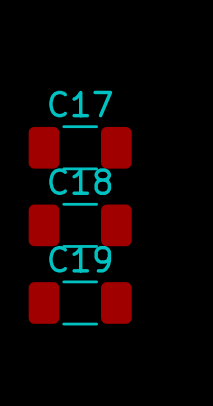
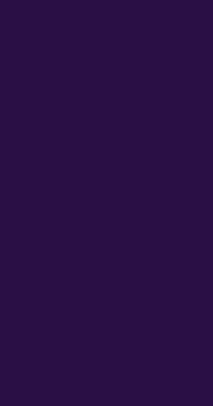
C17: (80, 147) -> none
C18: (80, 225) -> none
C19: (80, 302) -> none

